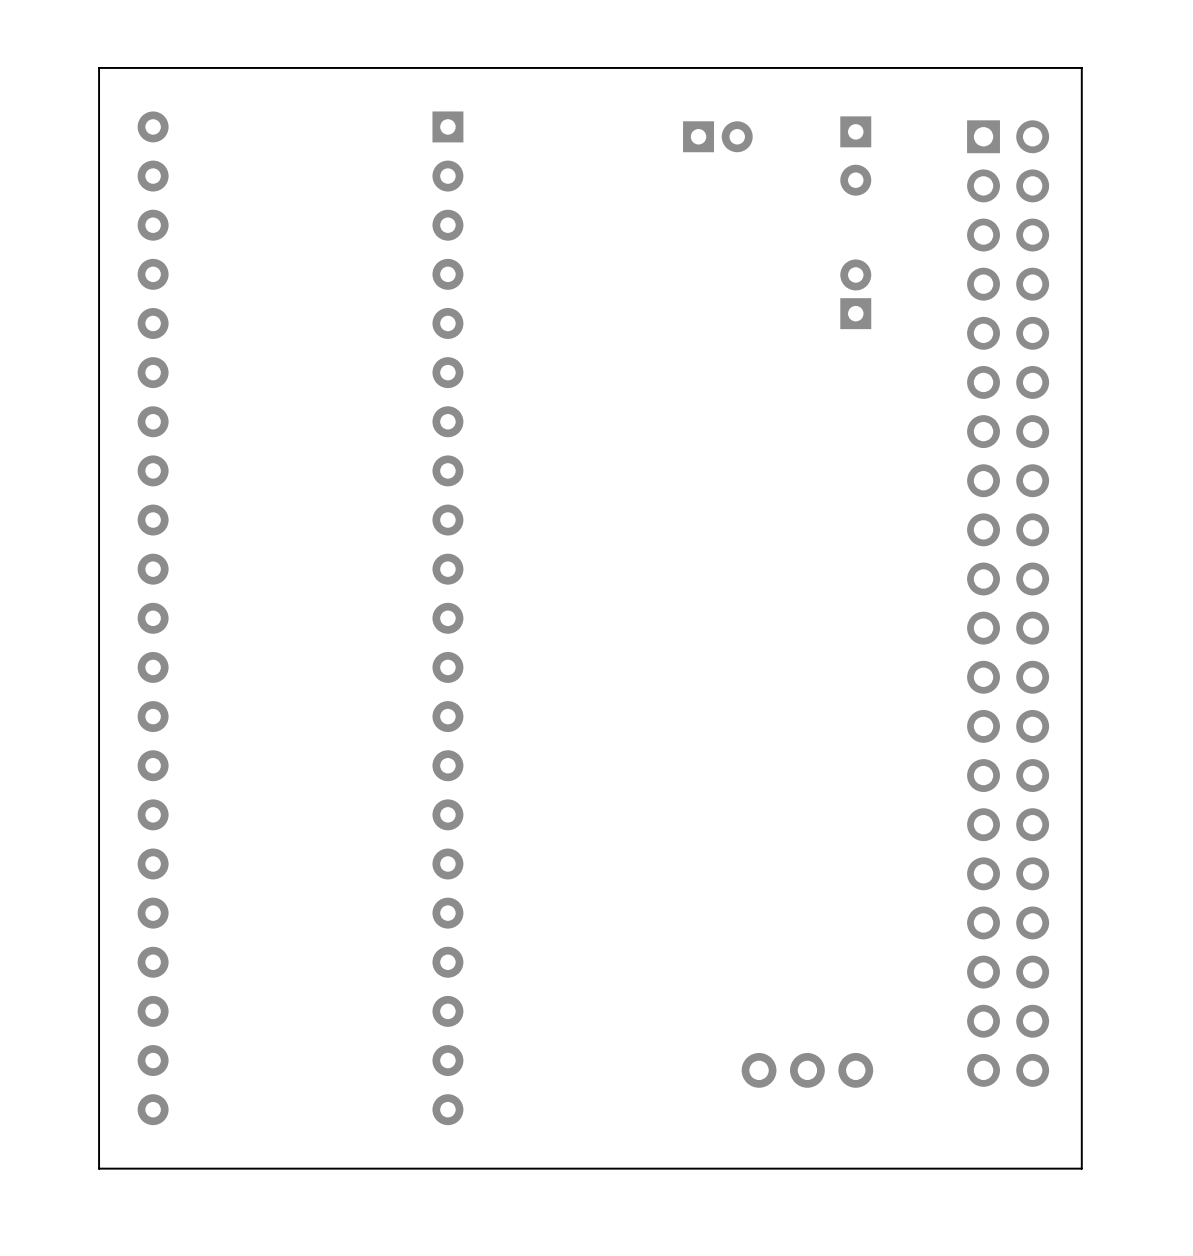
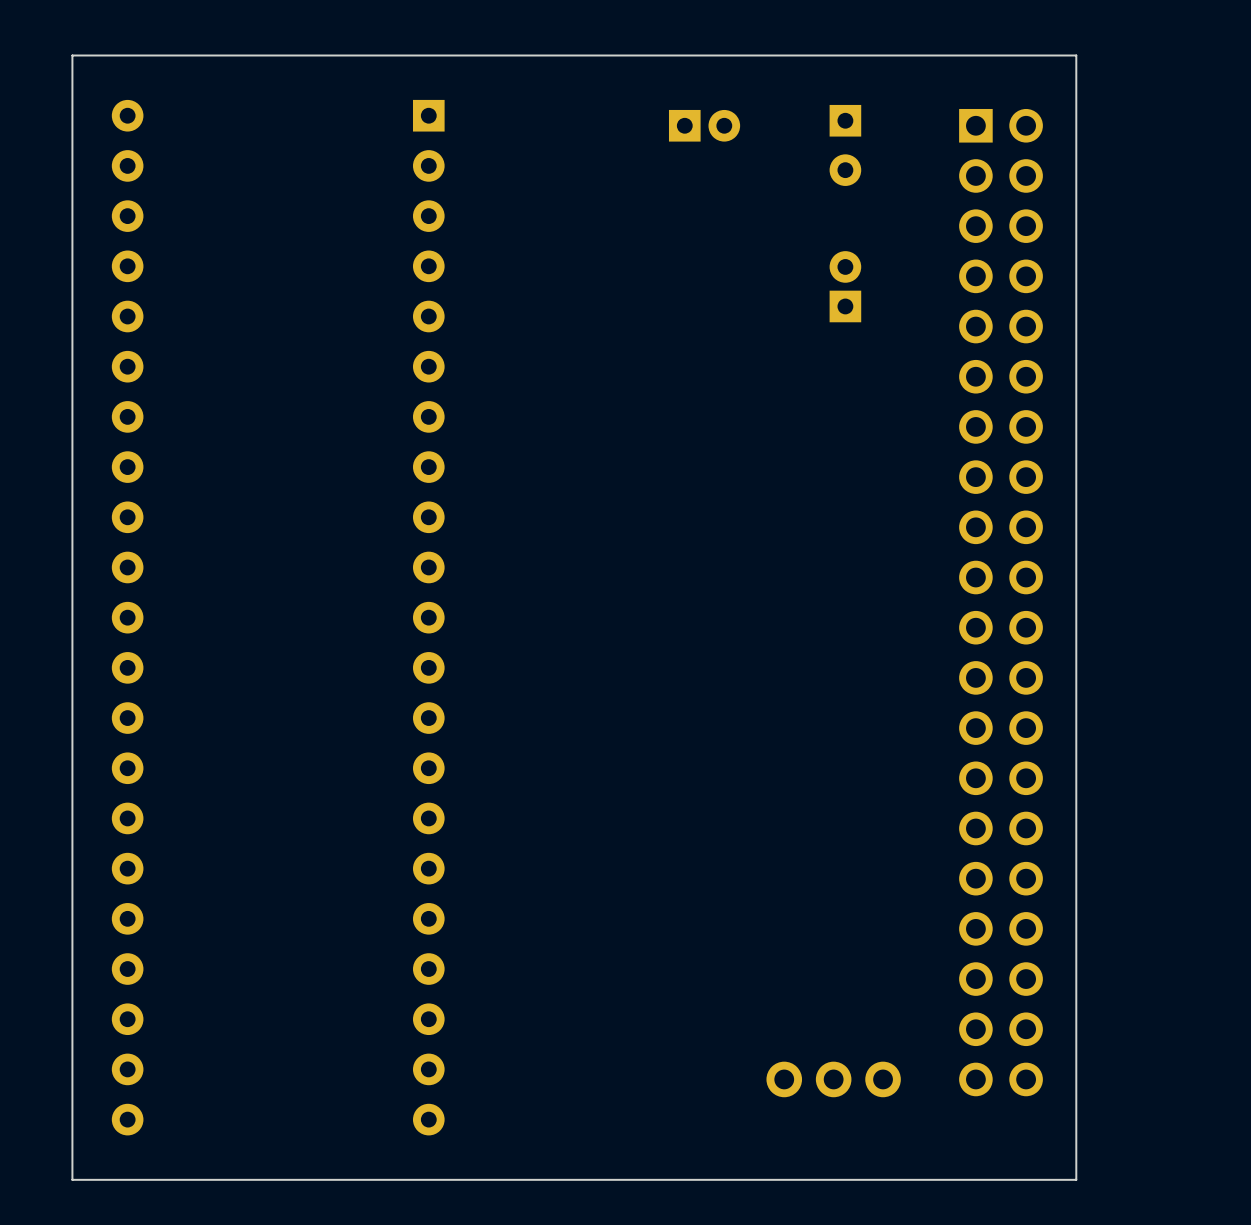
part position: (807, 1070) -> (833, 1079)

